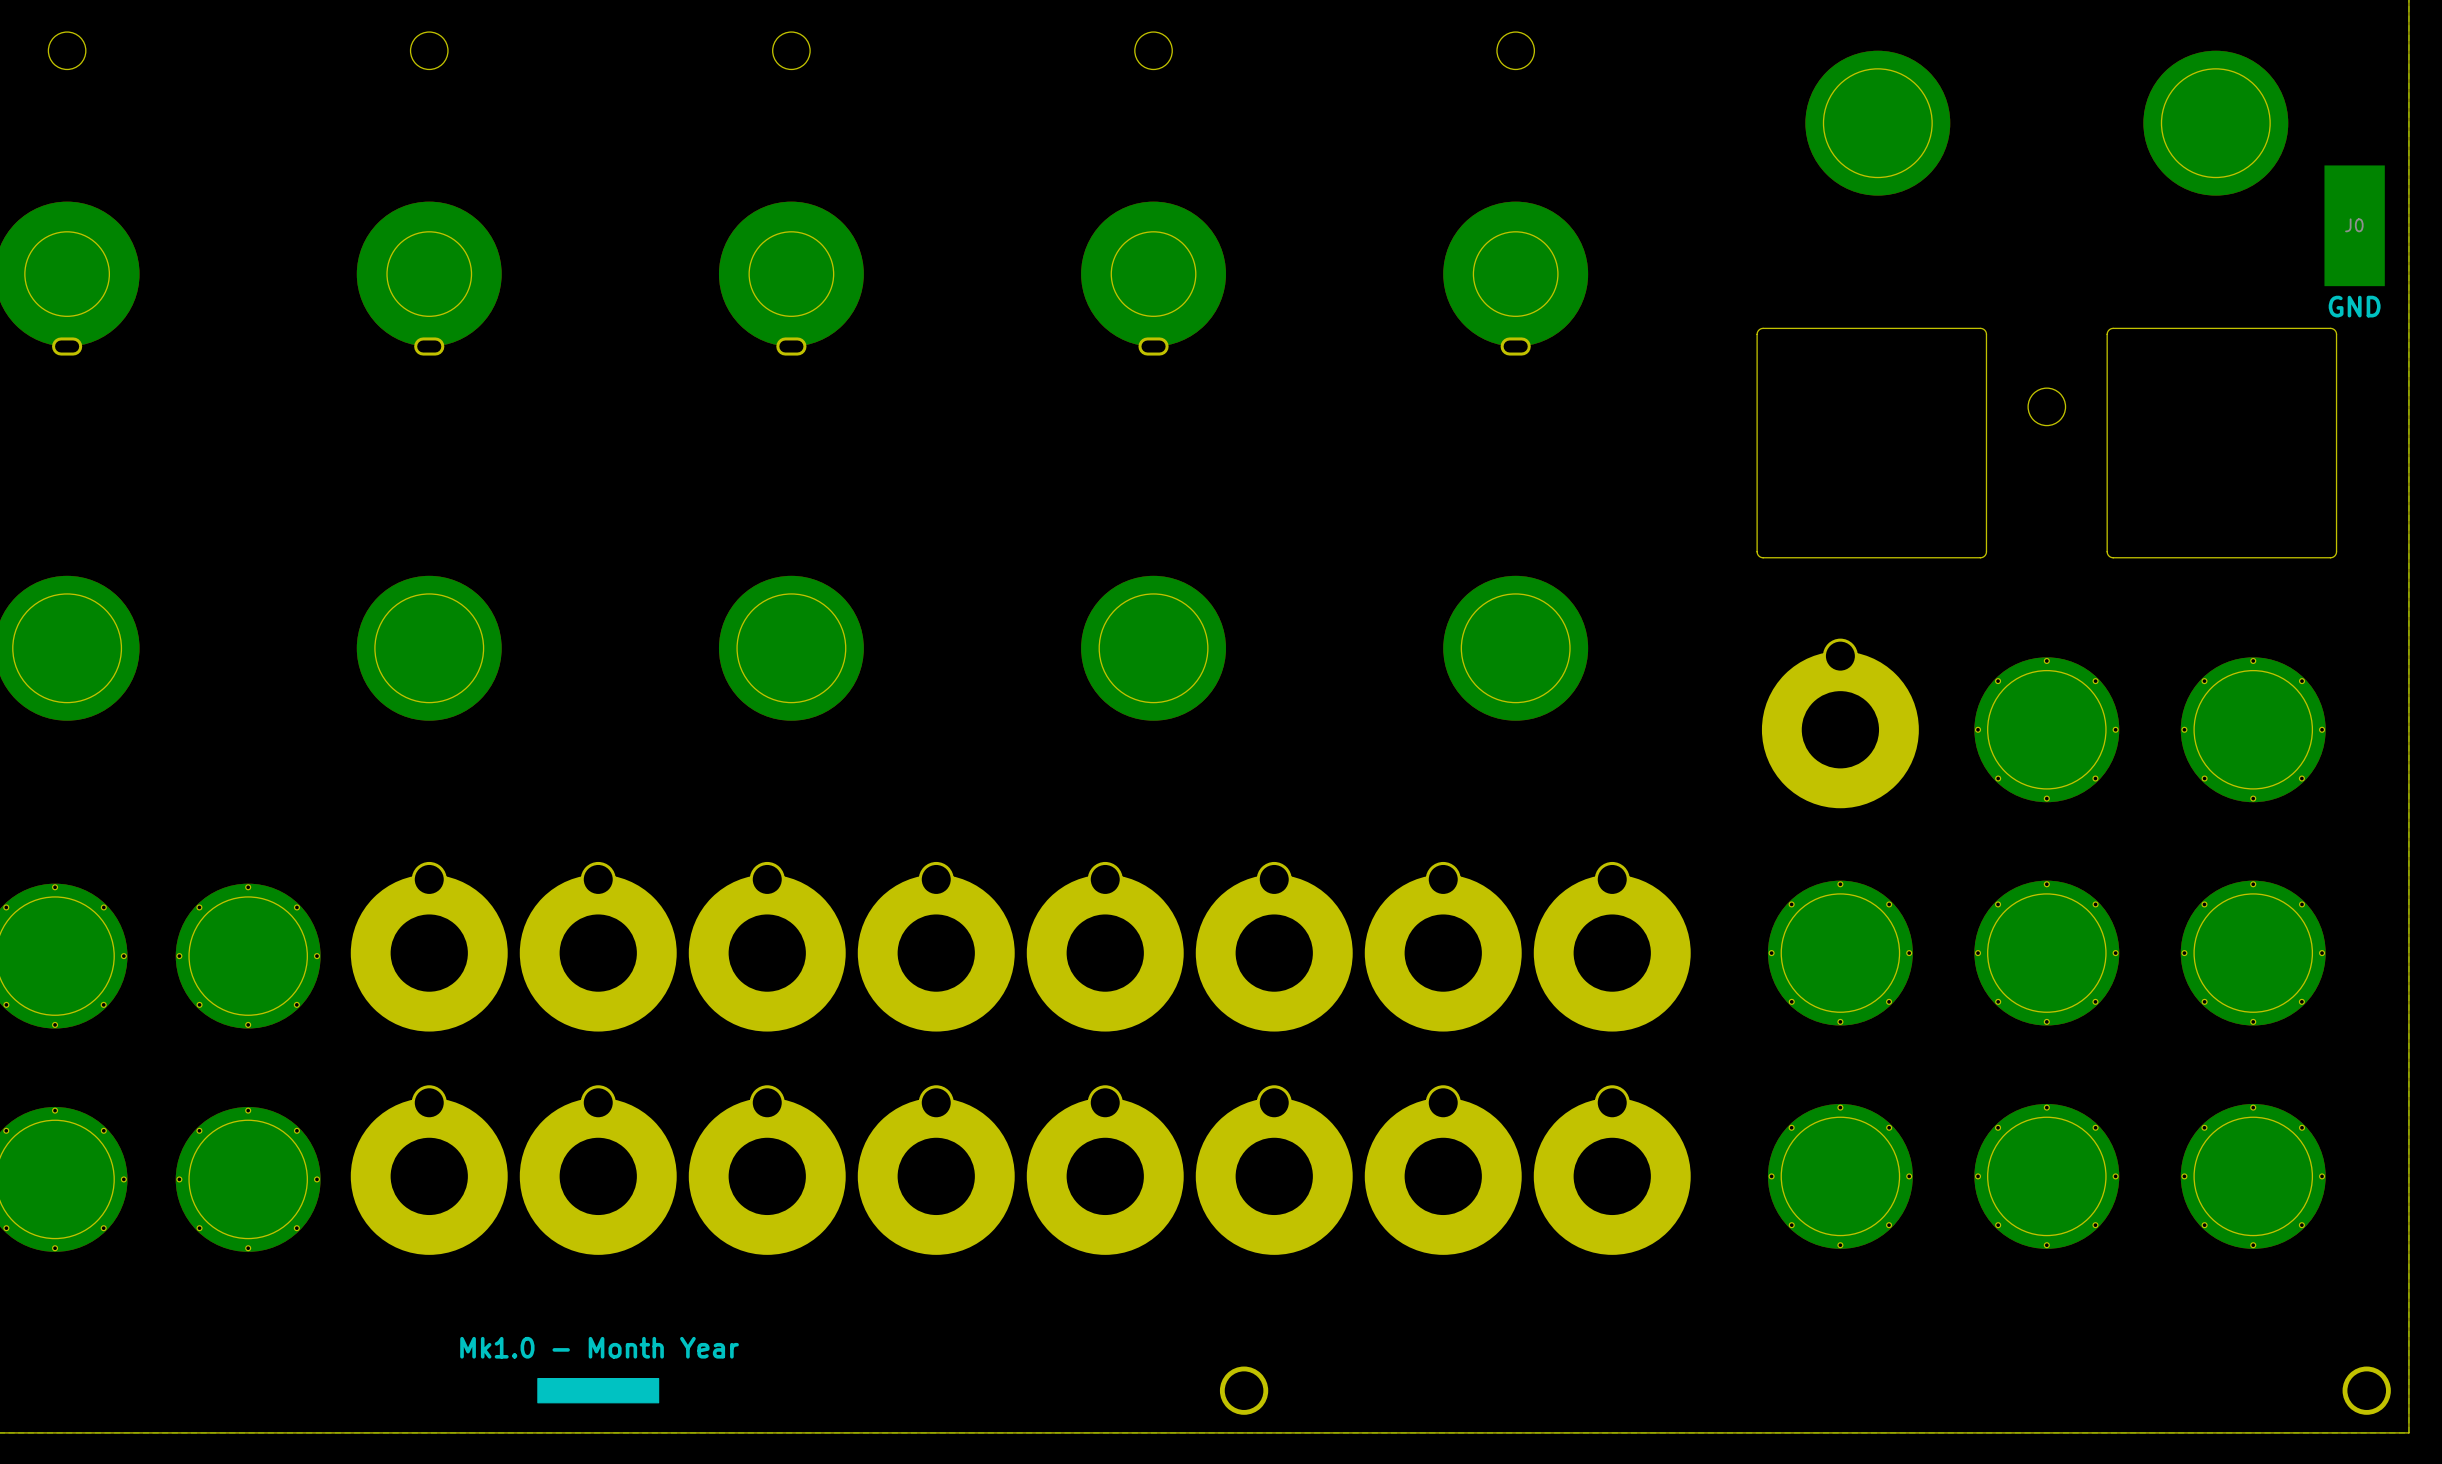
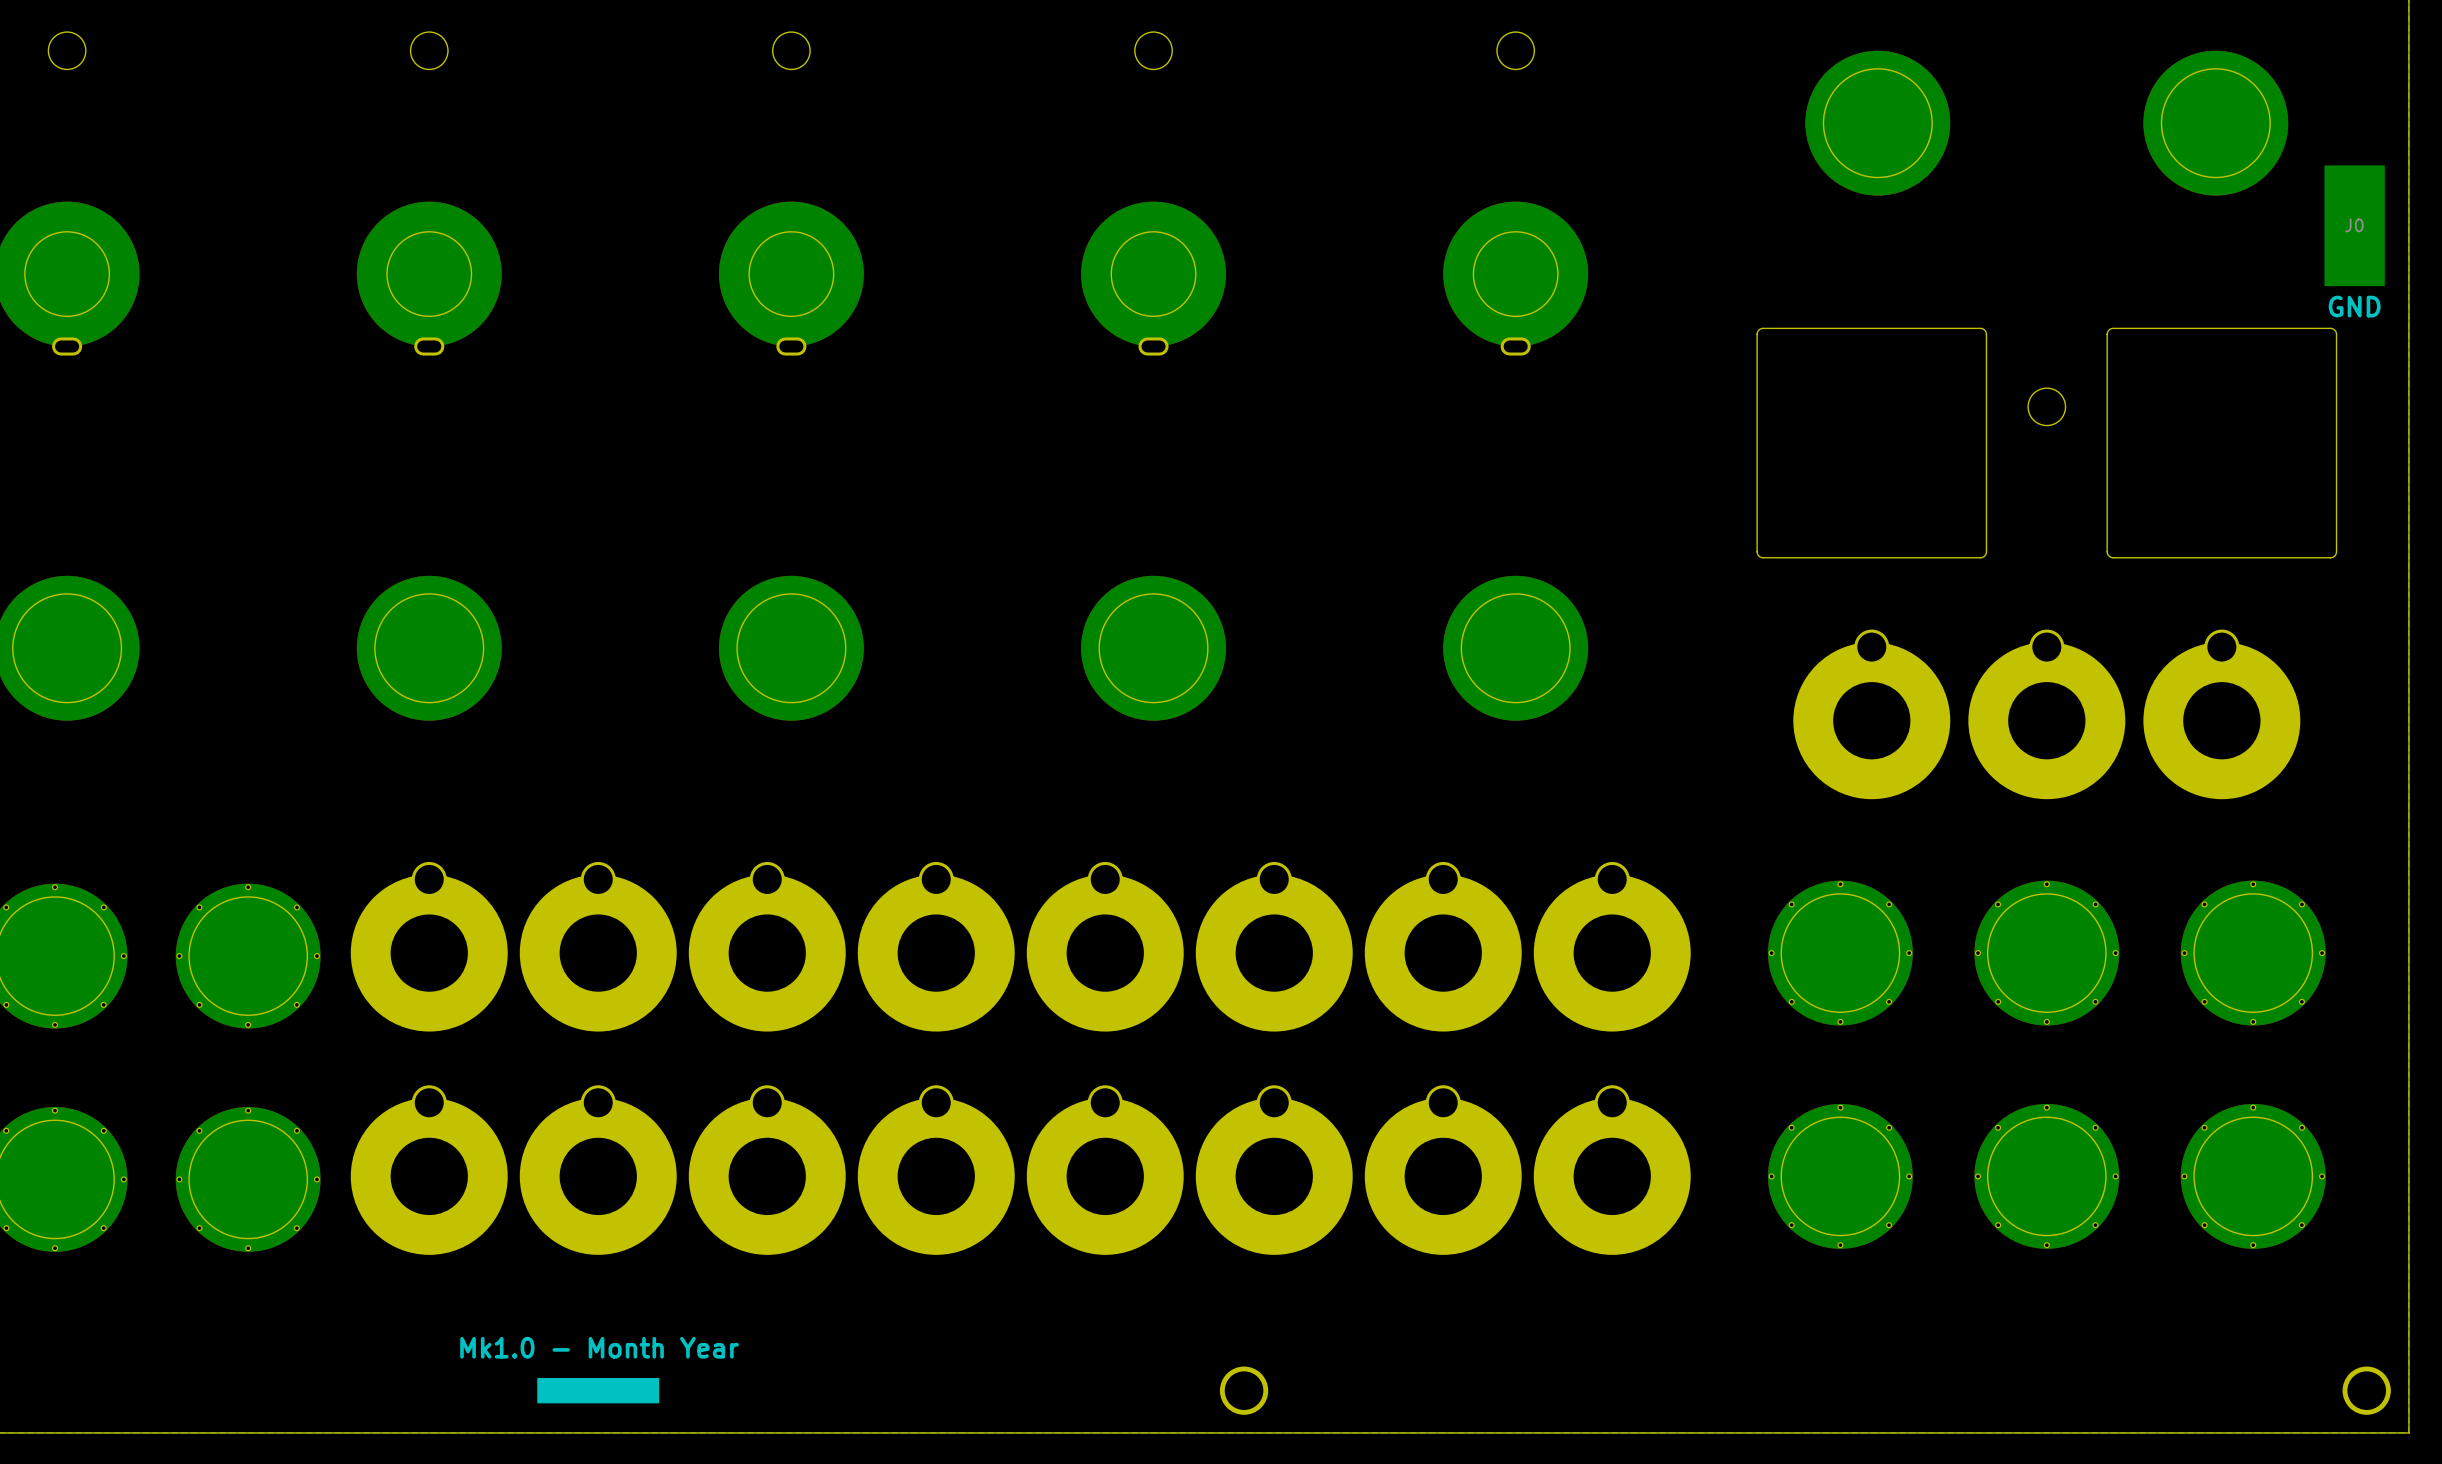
part: none -> (2046, 714)
part: none -> (2221, 714)
part position: (1840, 723) -> (1871, 714)
part: (2046, 729) -> none
part: (2253, 729) -> none

